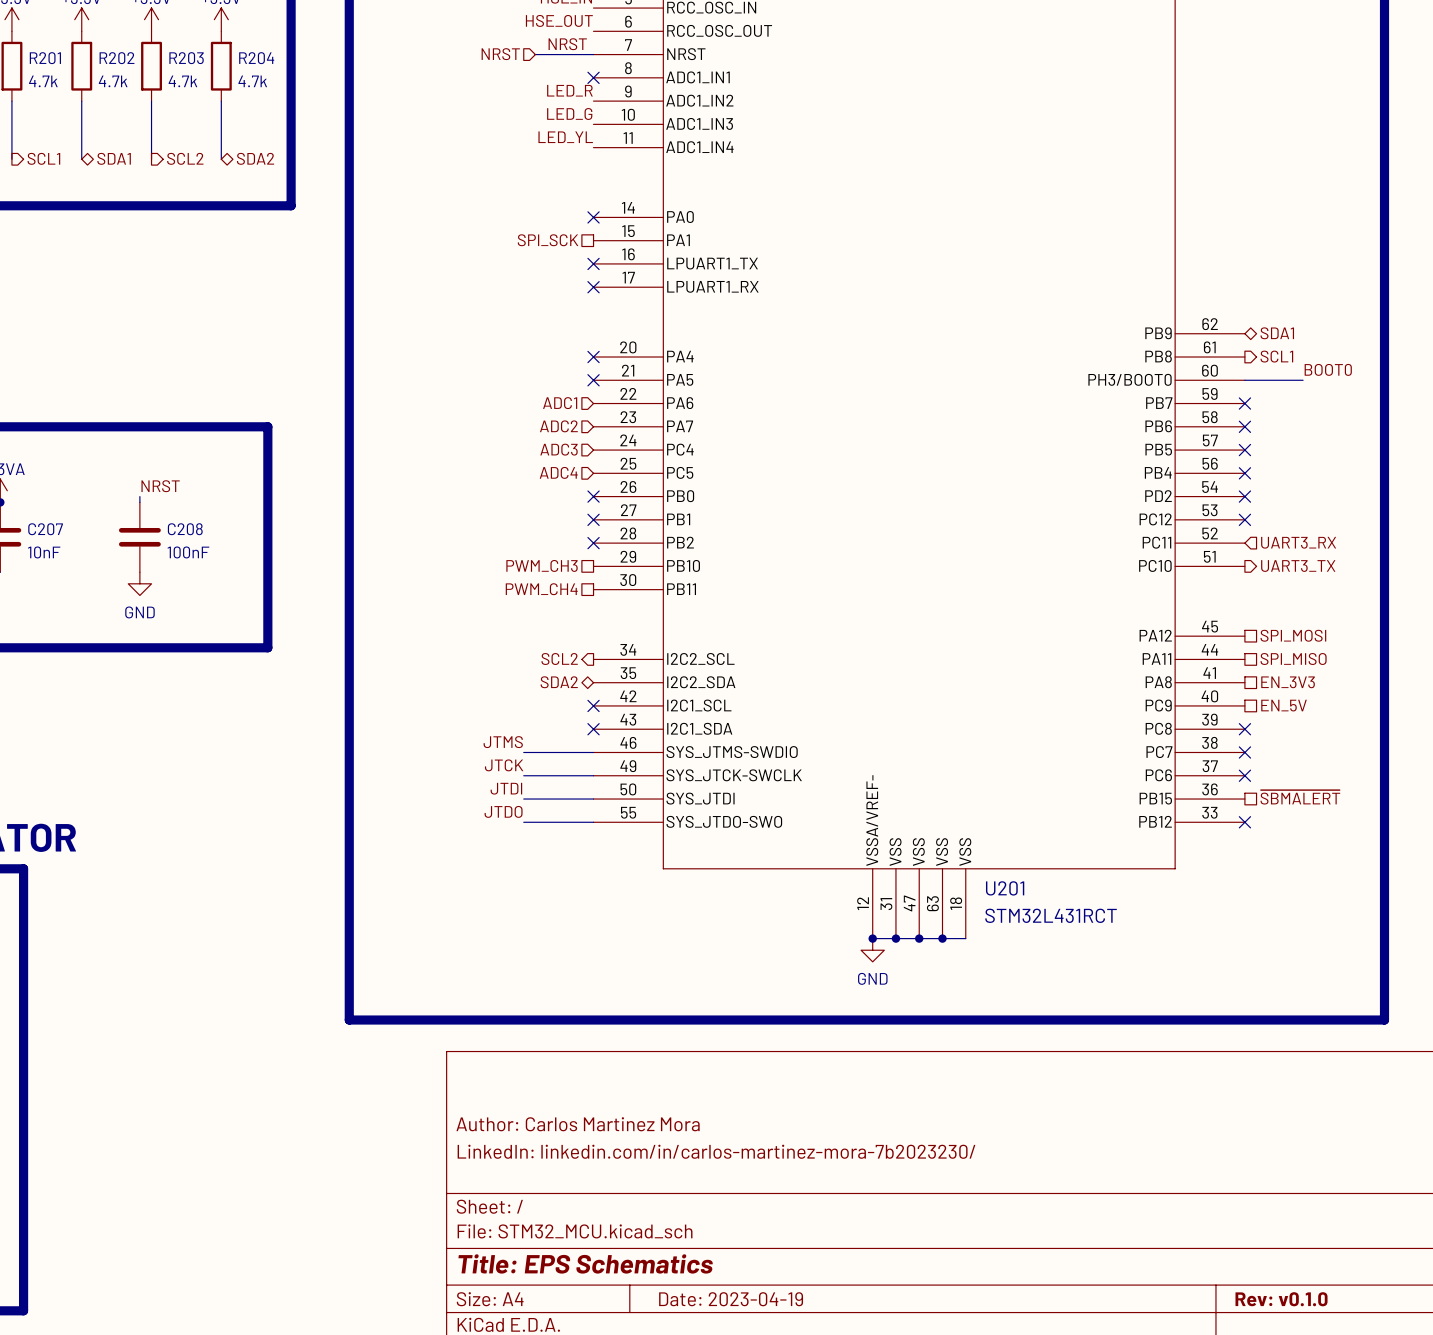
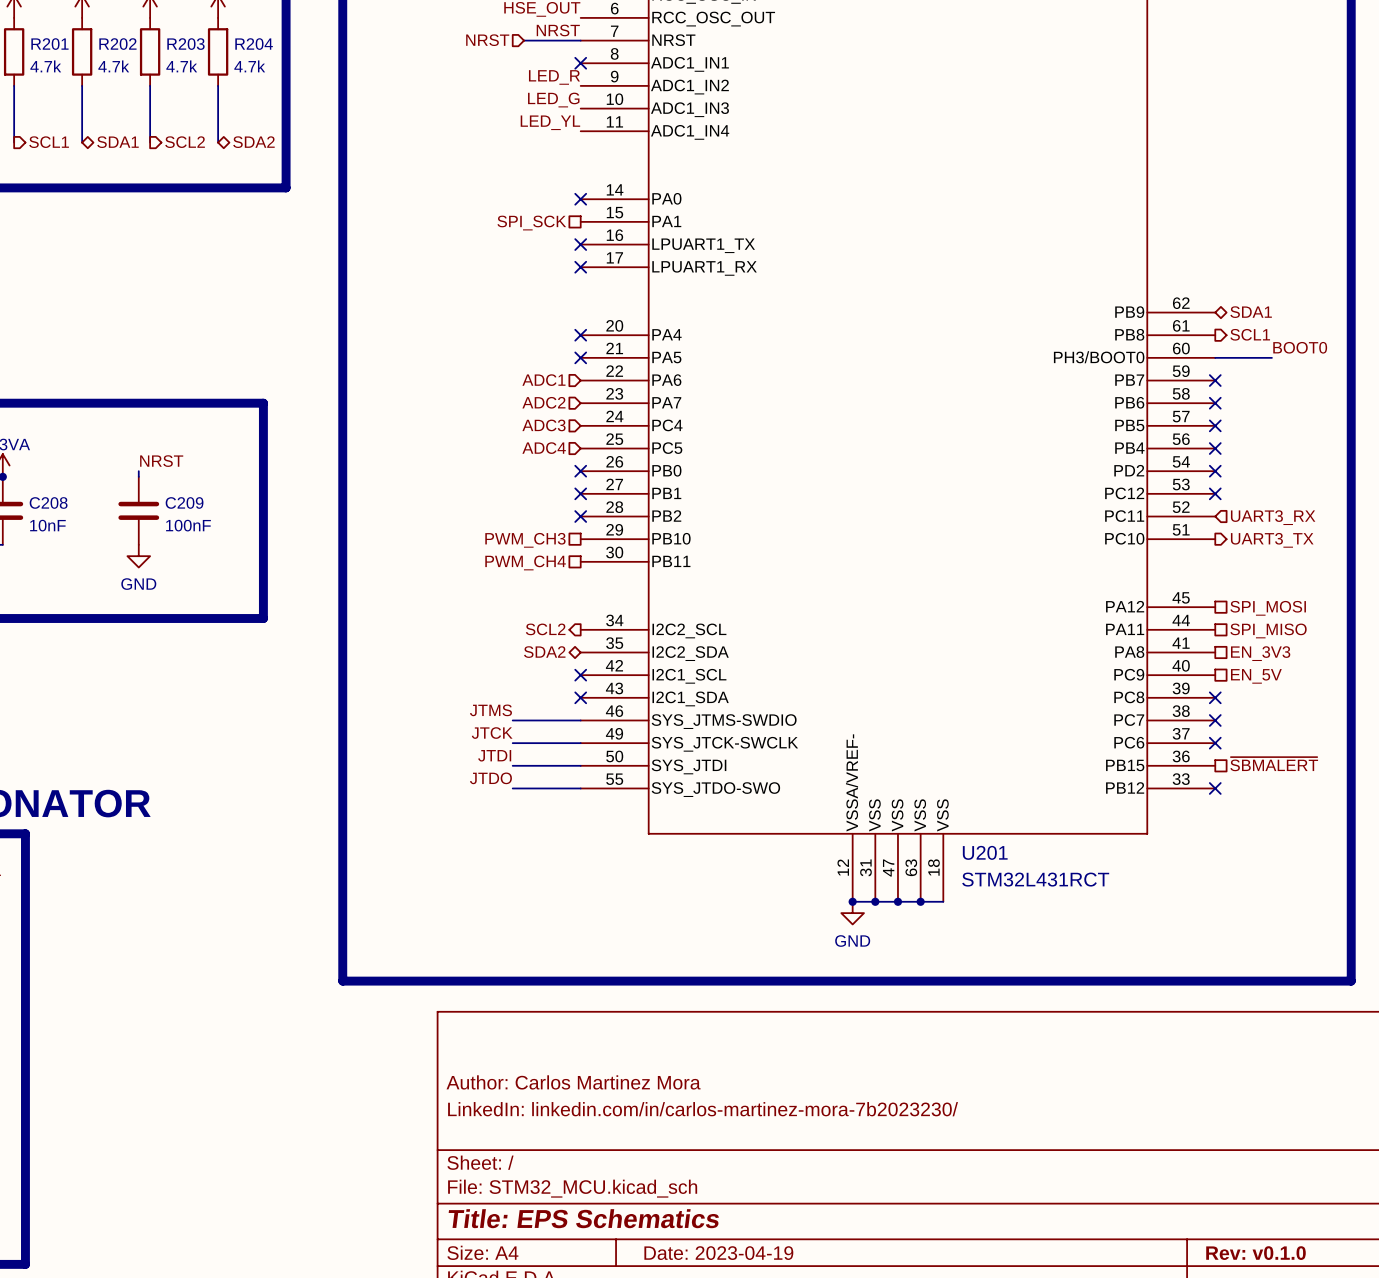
C207 name: C207 (45, 529) -> C208 (48, 502)
C208 name: C208 (185, 529) -> C209 (184, 502)

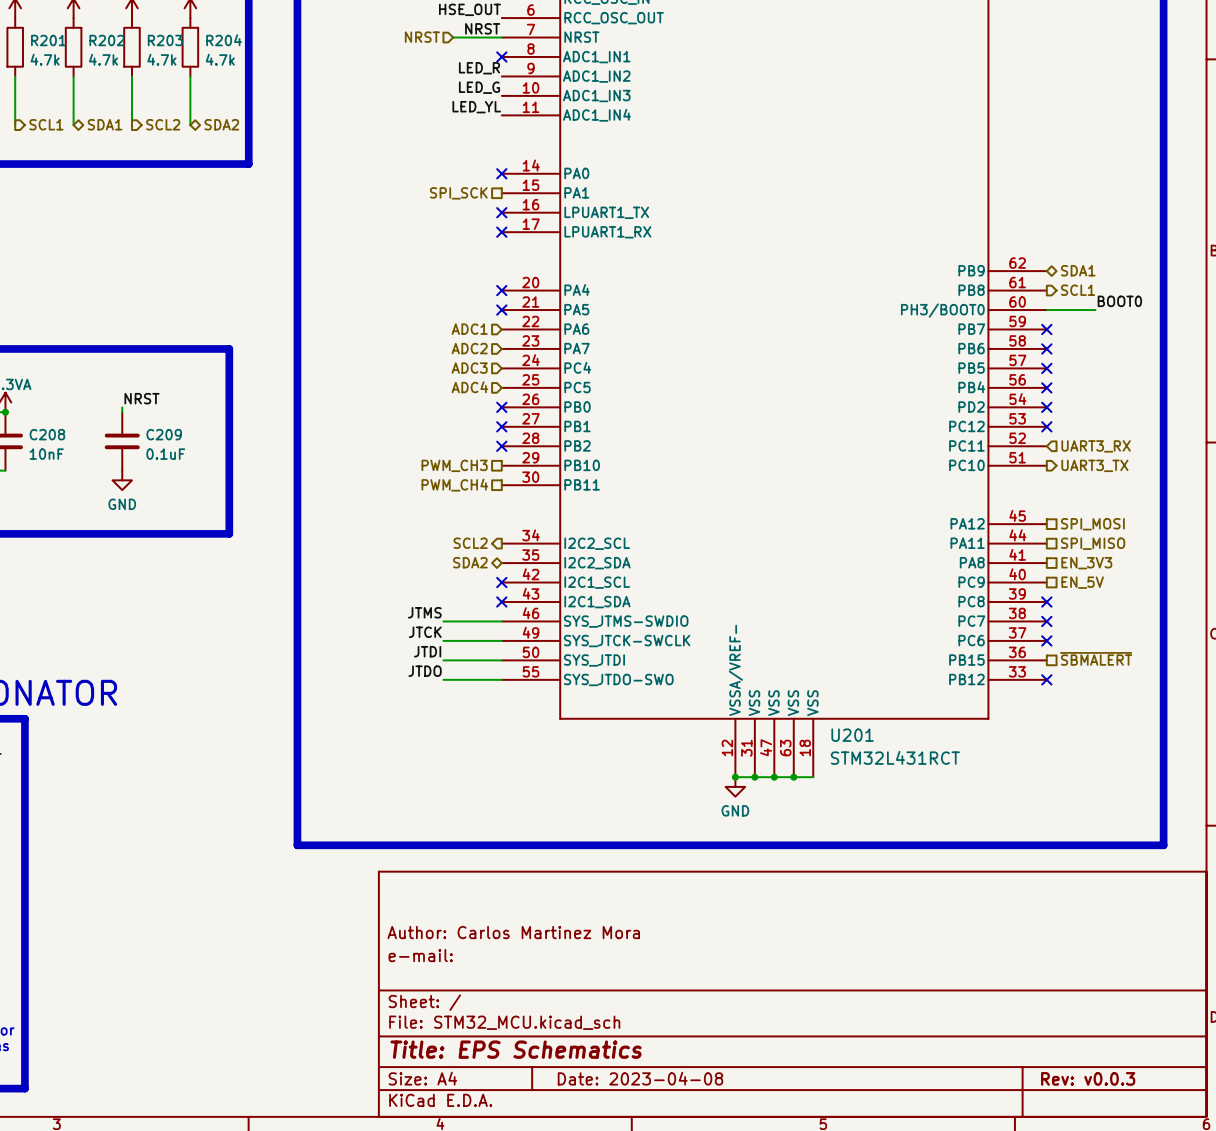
C209 value: 100nF (188, 525) -> 0.1uF (165, 454)
title block: LinkedIn: linkedin.com/in/carlos-martinez-mora-7b2023230/ (703, 1109) -> e-mail: (420, 955)
title block: Date: 2023-04-19 (718, 1253) -> Date: 2023-04-08 (640, 1078)
title block: Rev: v0.1.0 (1255, 1253) -> Rev: v0.0.3 (1088, 1078)

